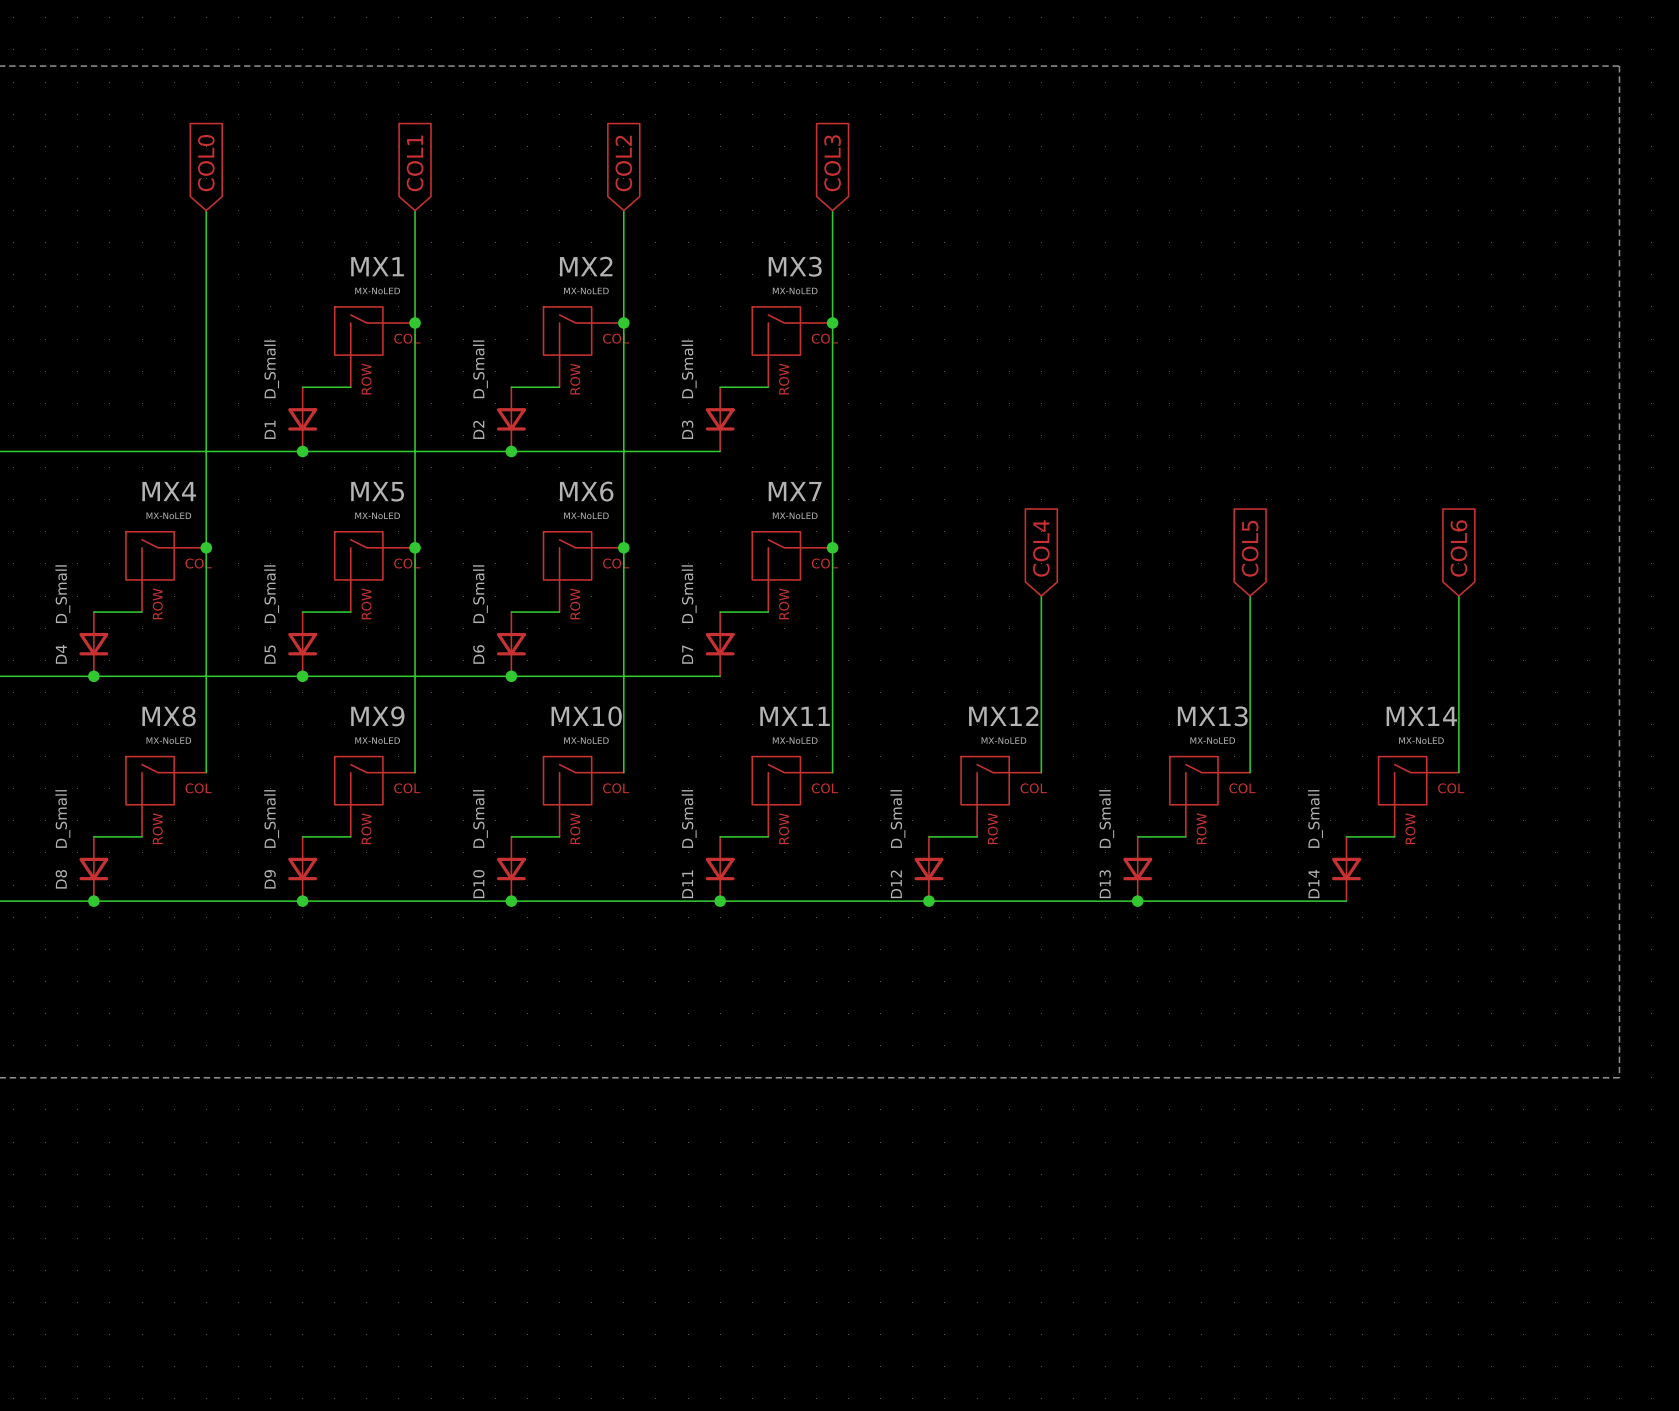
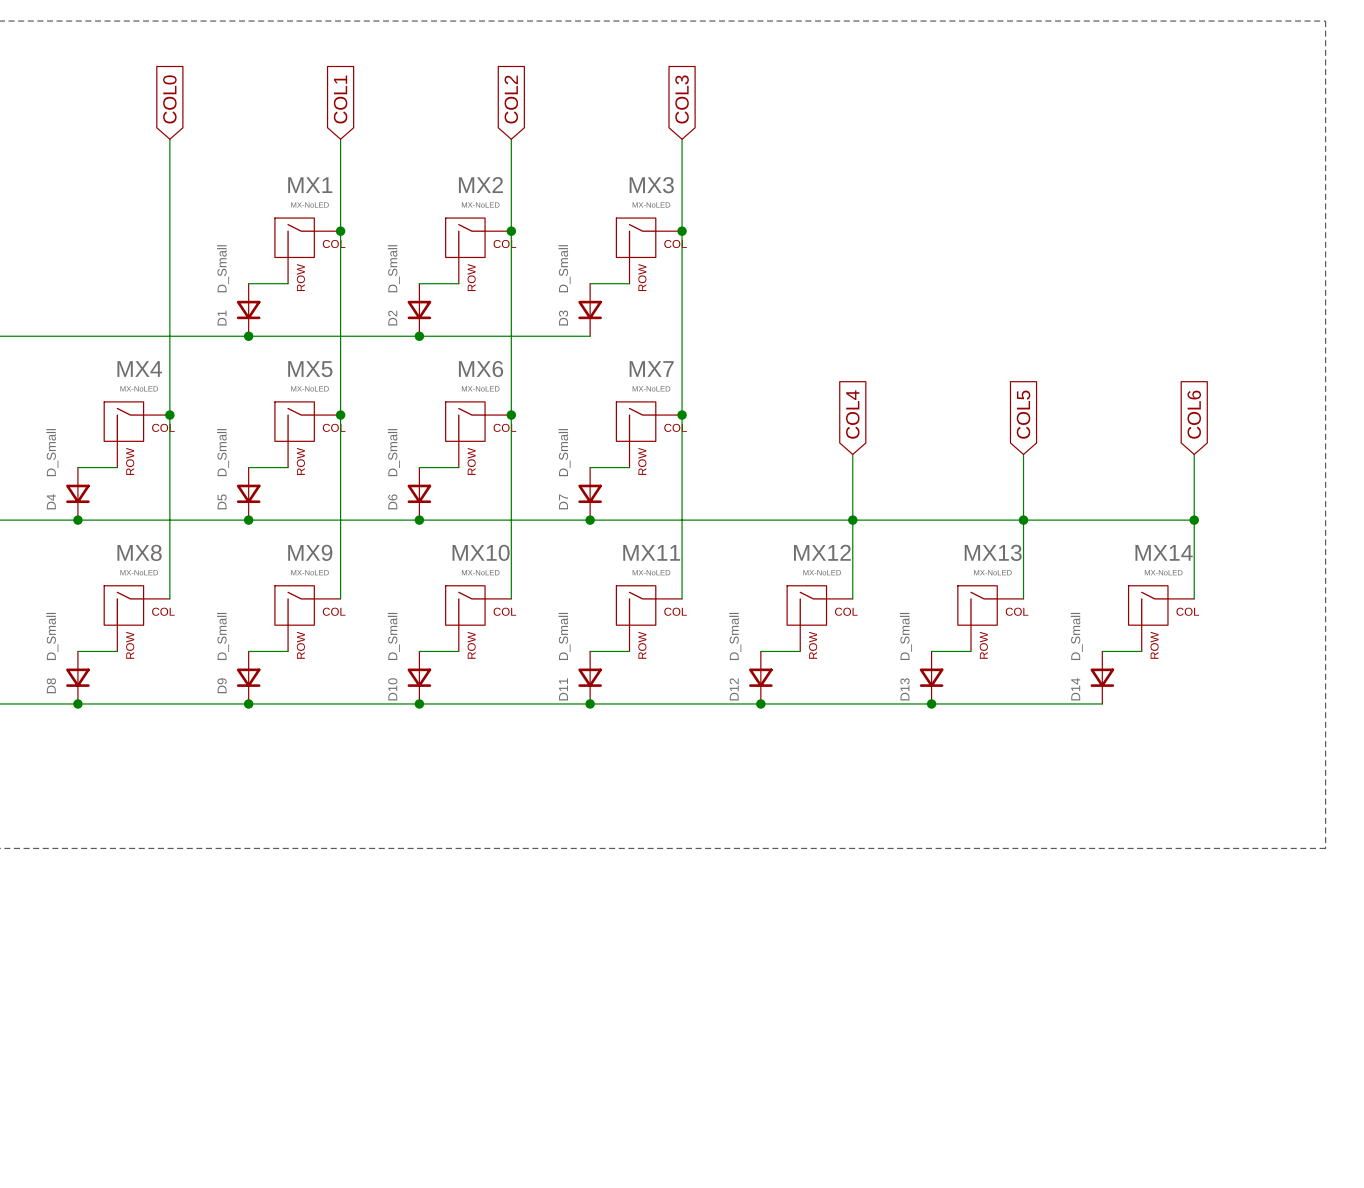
wire: none -> (590, 520) (1194, 520)
junction: none -> (590, 520)
junction: none -> (852, 520)
junction: none -> (1023, 520)
junction: none -> (1194, 520)

